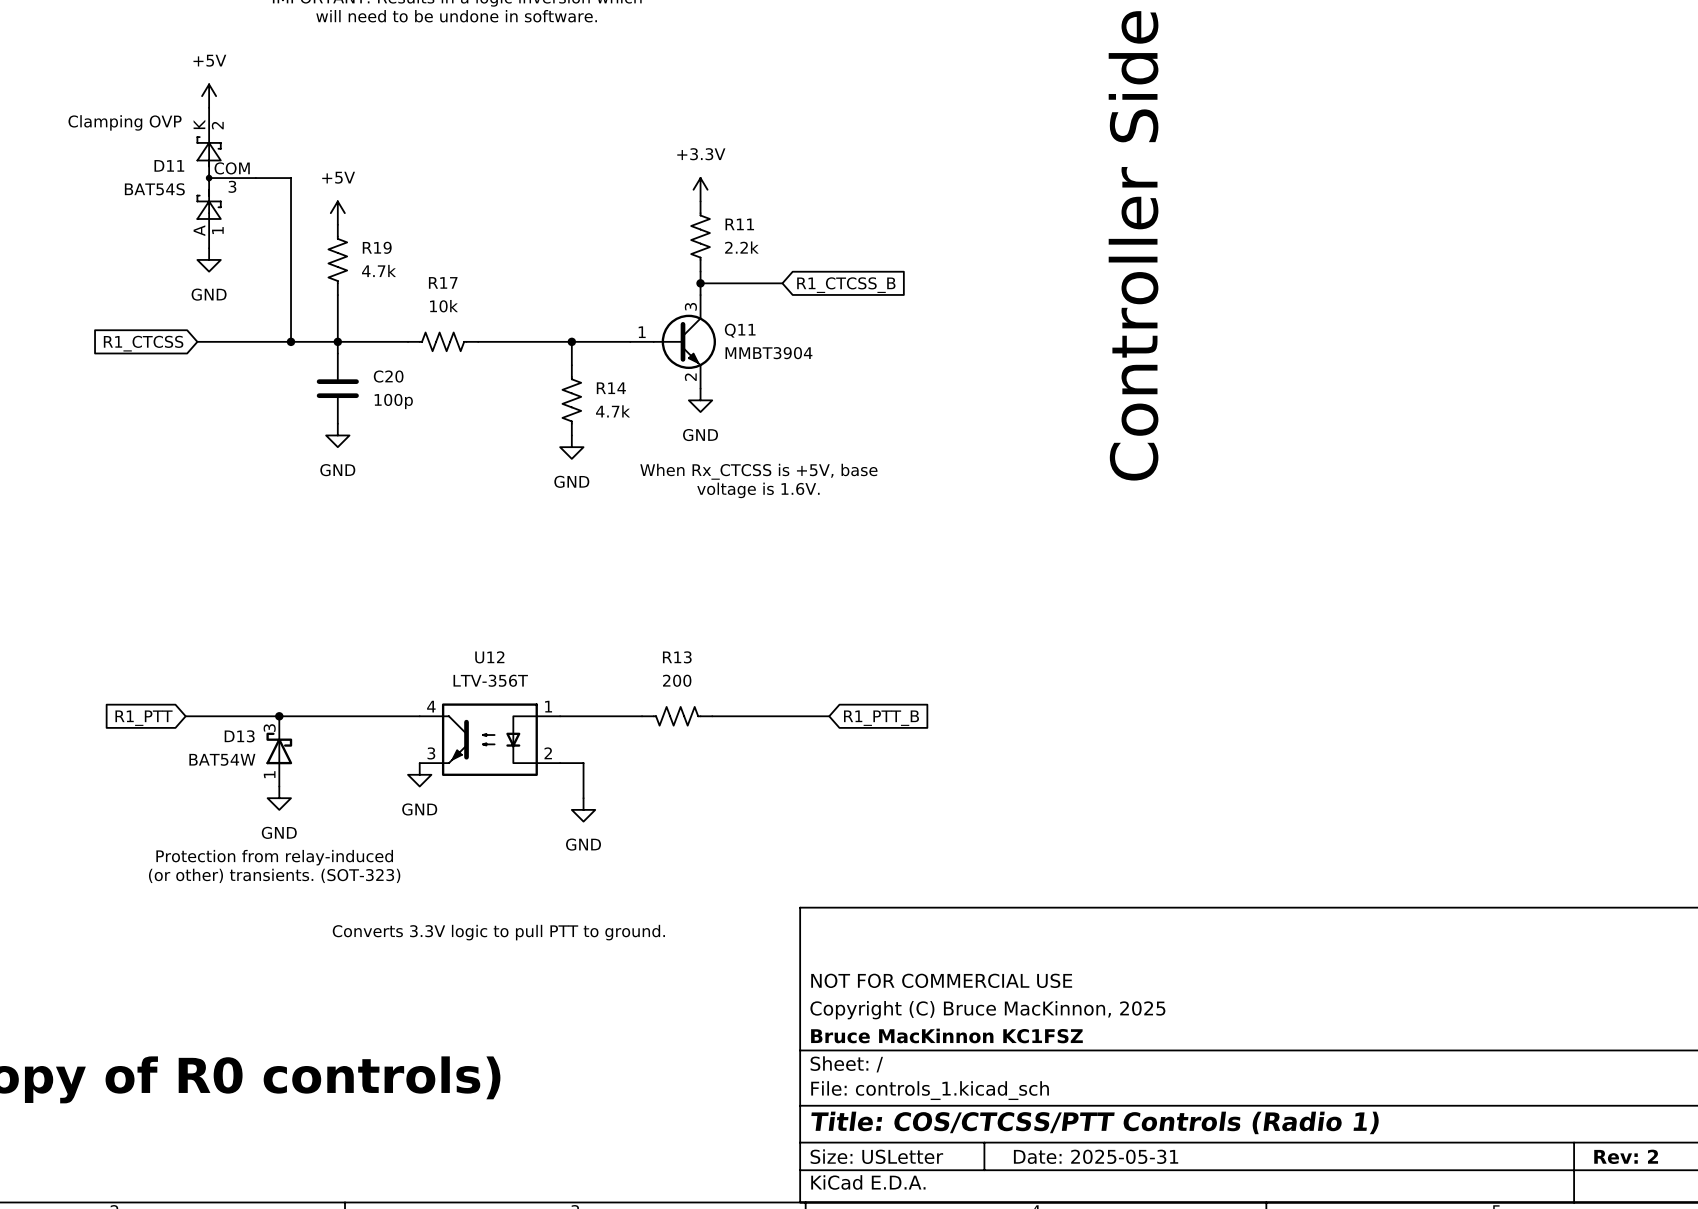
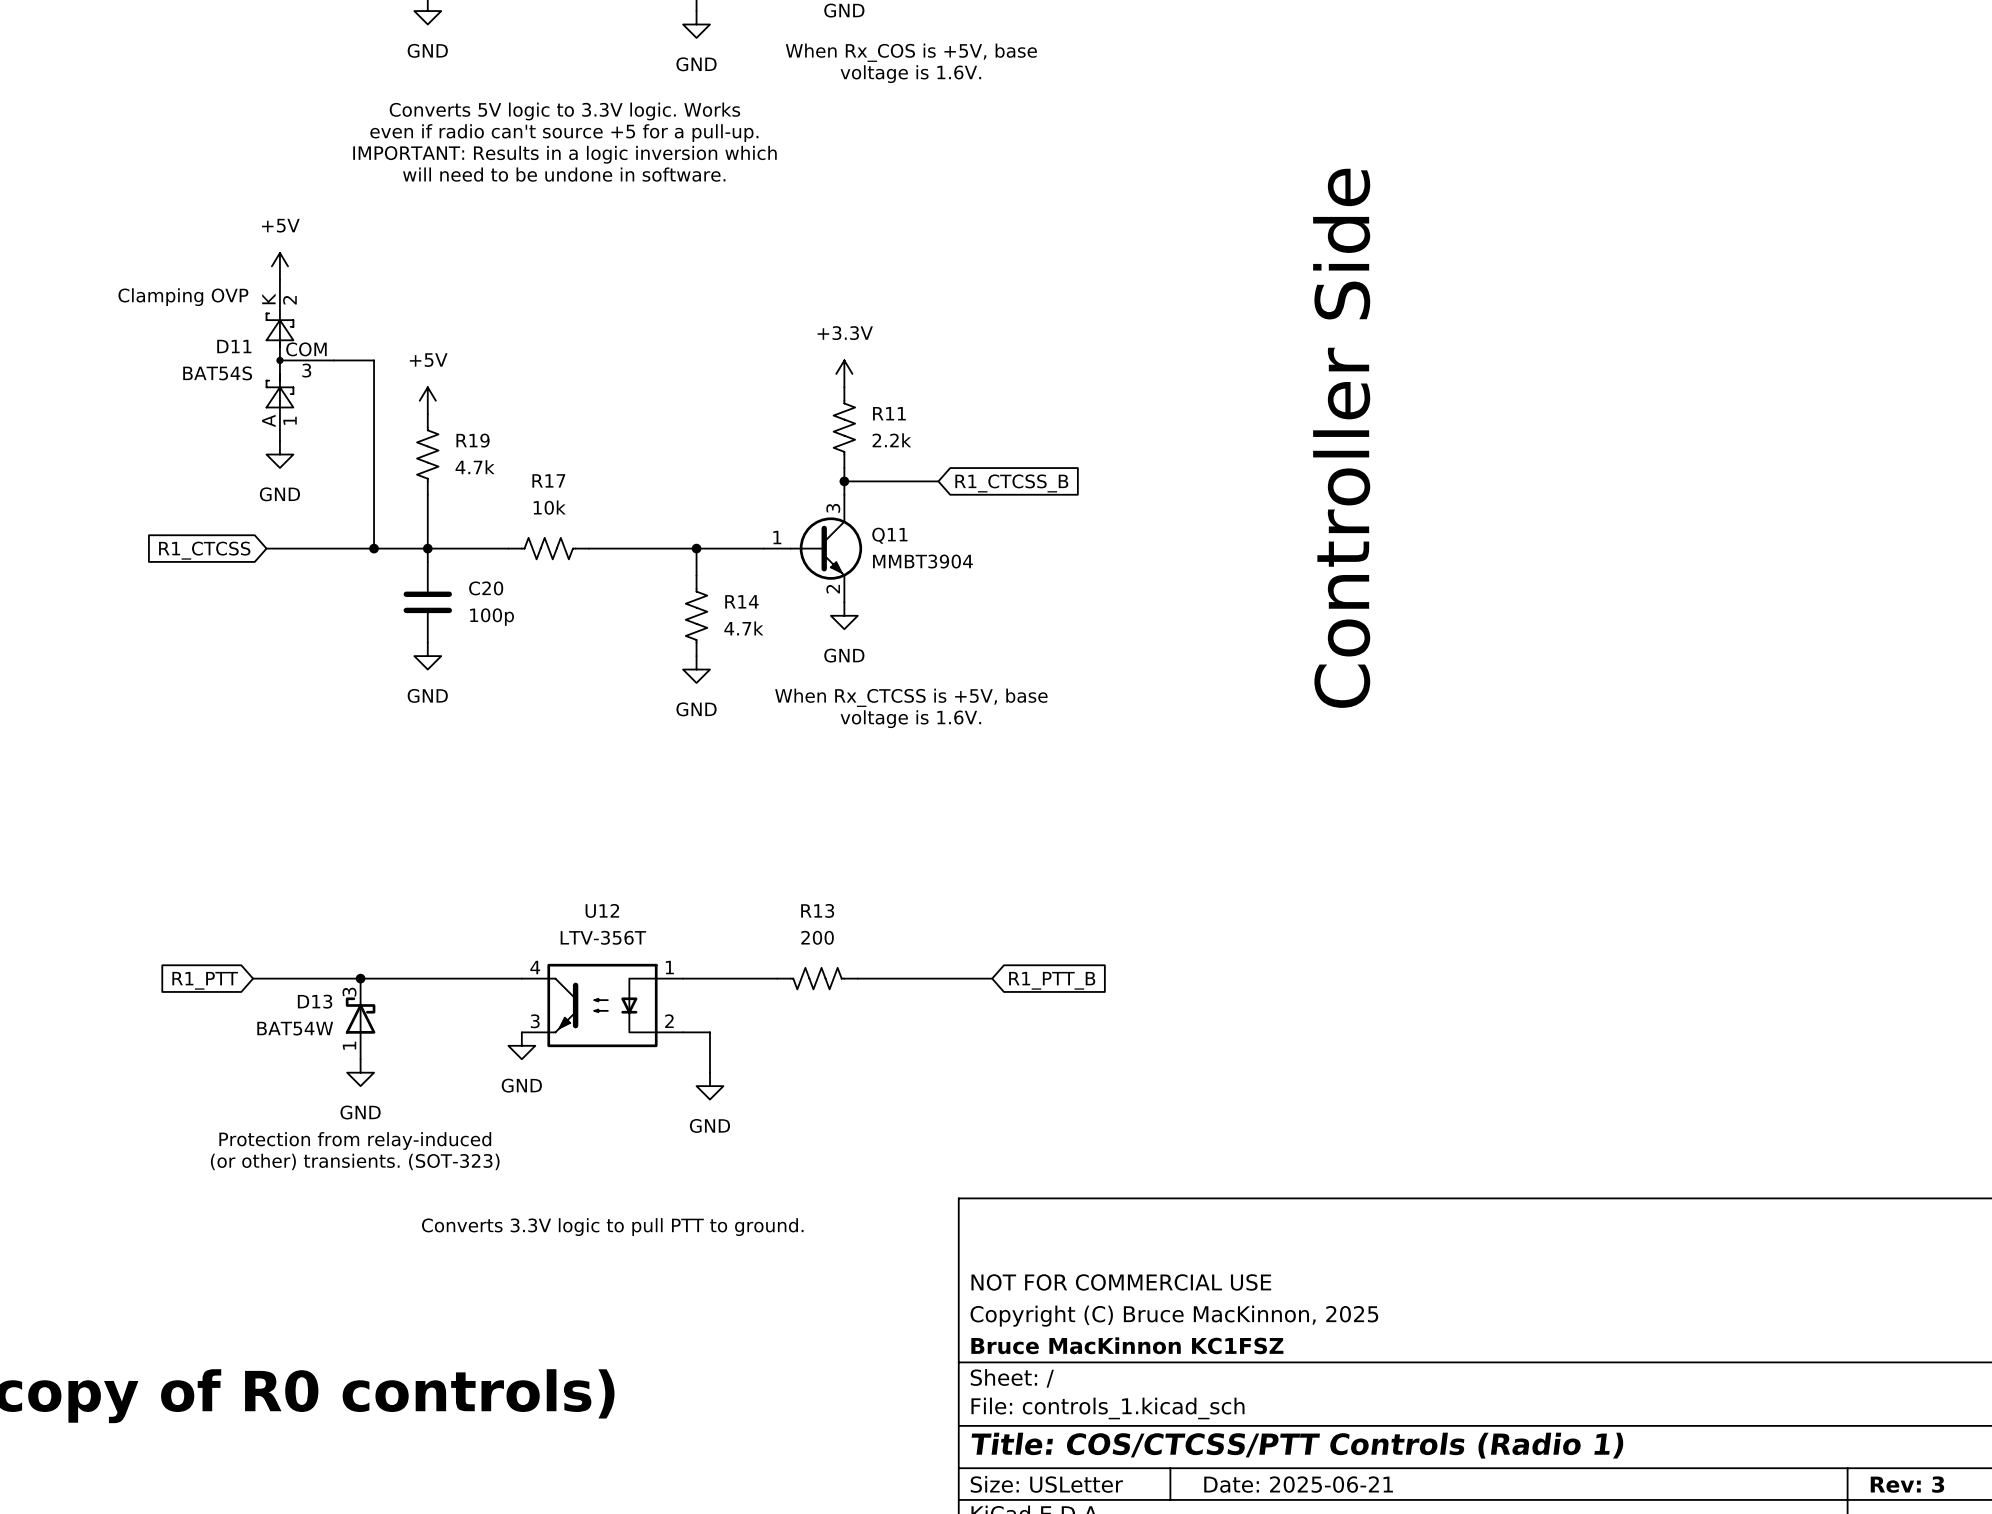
title block: Date: 2025-05-31 (1096, 1156) -> Date: 2025-06-21 (1298, 1484)
title block: Rev: 2 (1626, 1156) -> Rev: 3 (1907, 1484)

